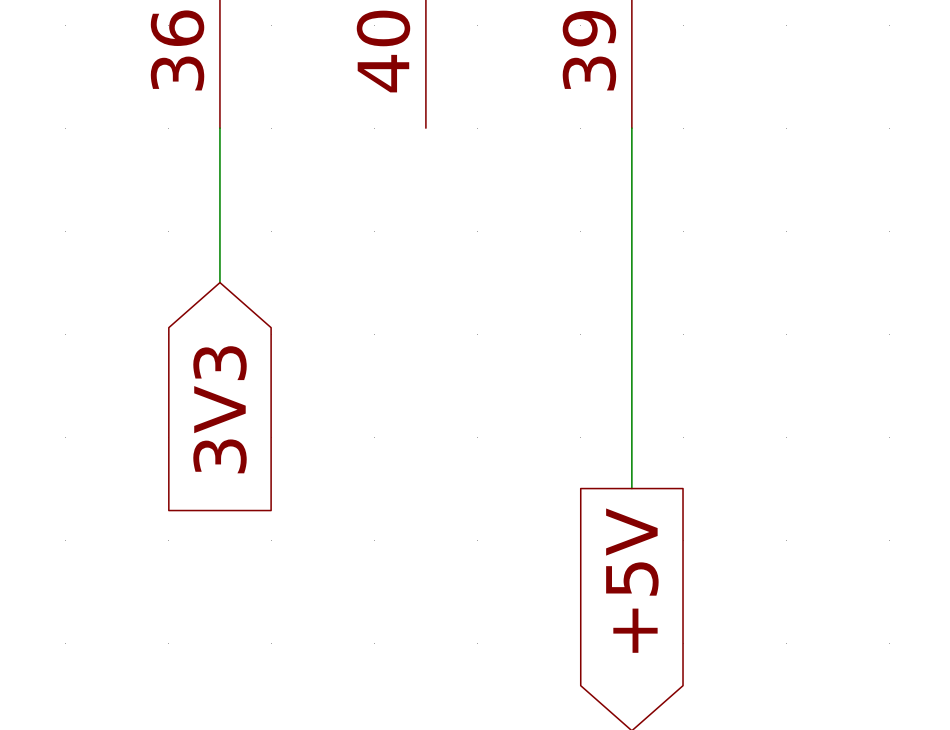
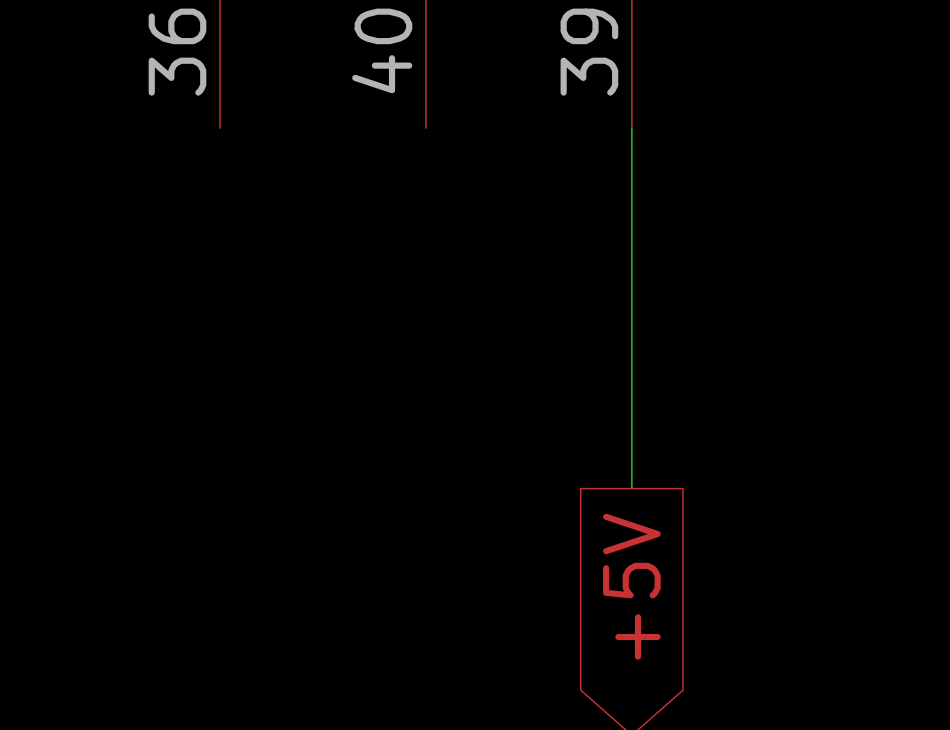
wire: (219, 128) (219, 282) -> none
global label: 3V3 (220, 409) -> none

